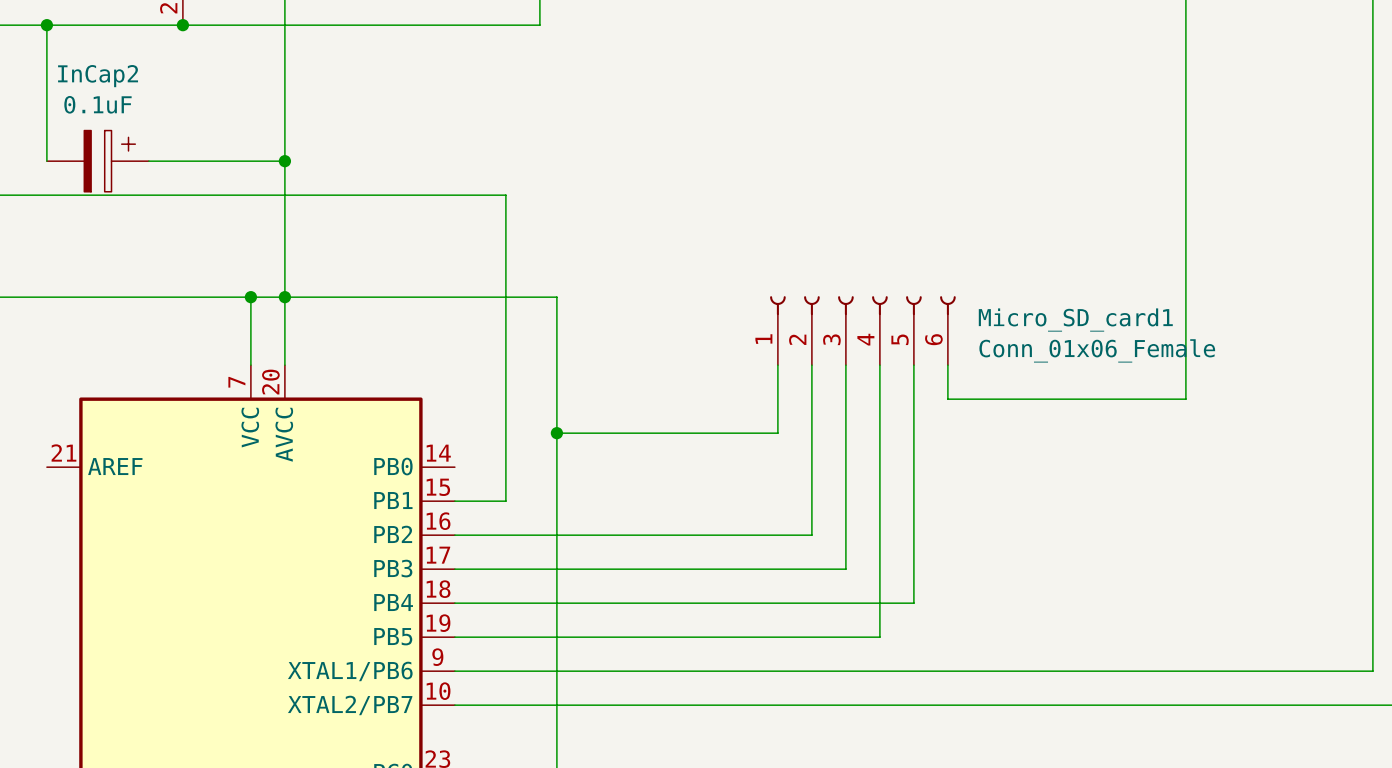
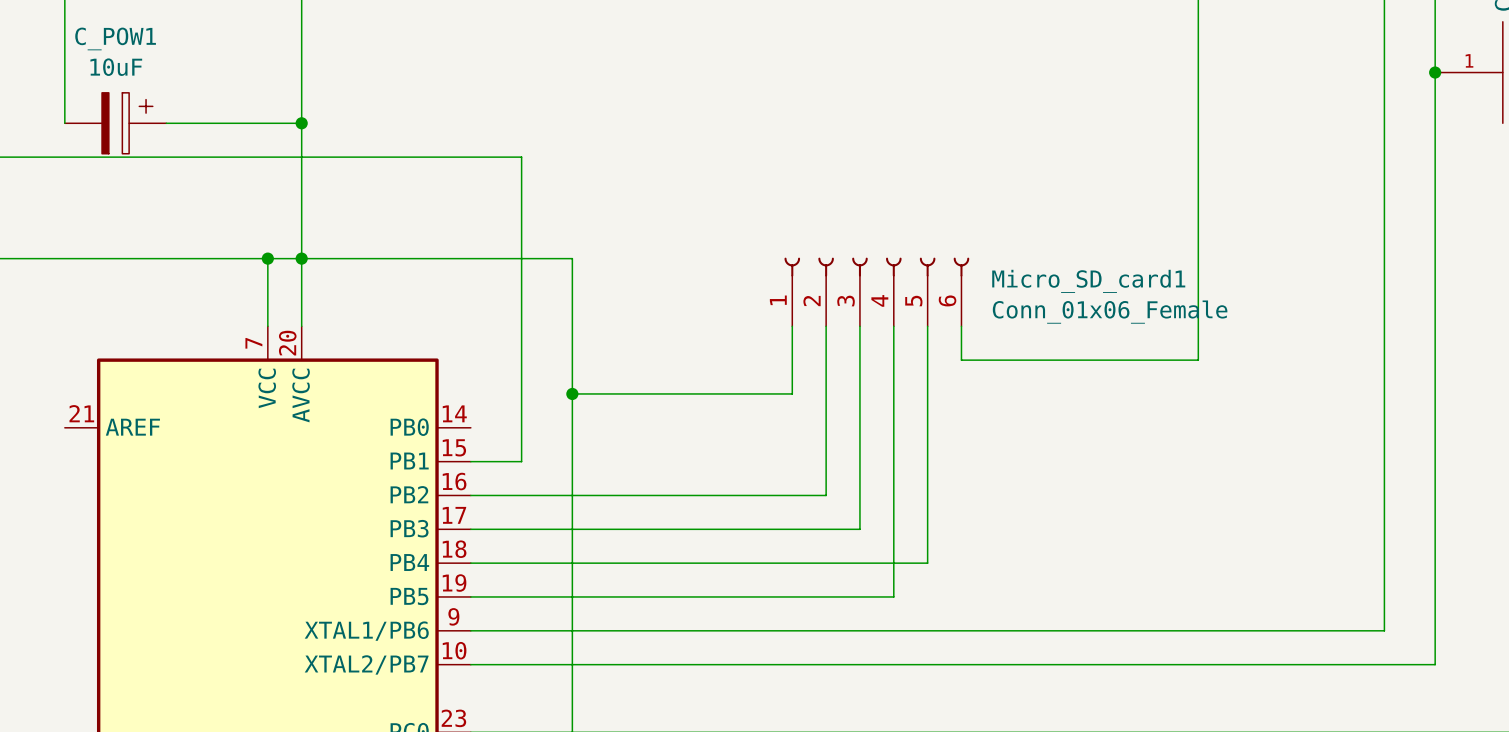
InCap2 name: InCap2 (98, 76) -> C_POW1 (115, 38)
InCap2 value: 0.1uF (97, 104) -> 10uF (116, 67)

